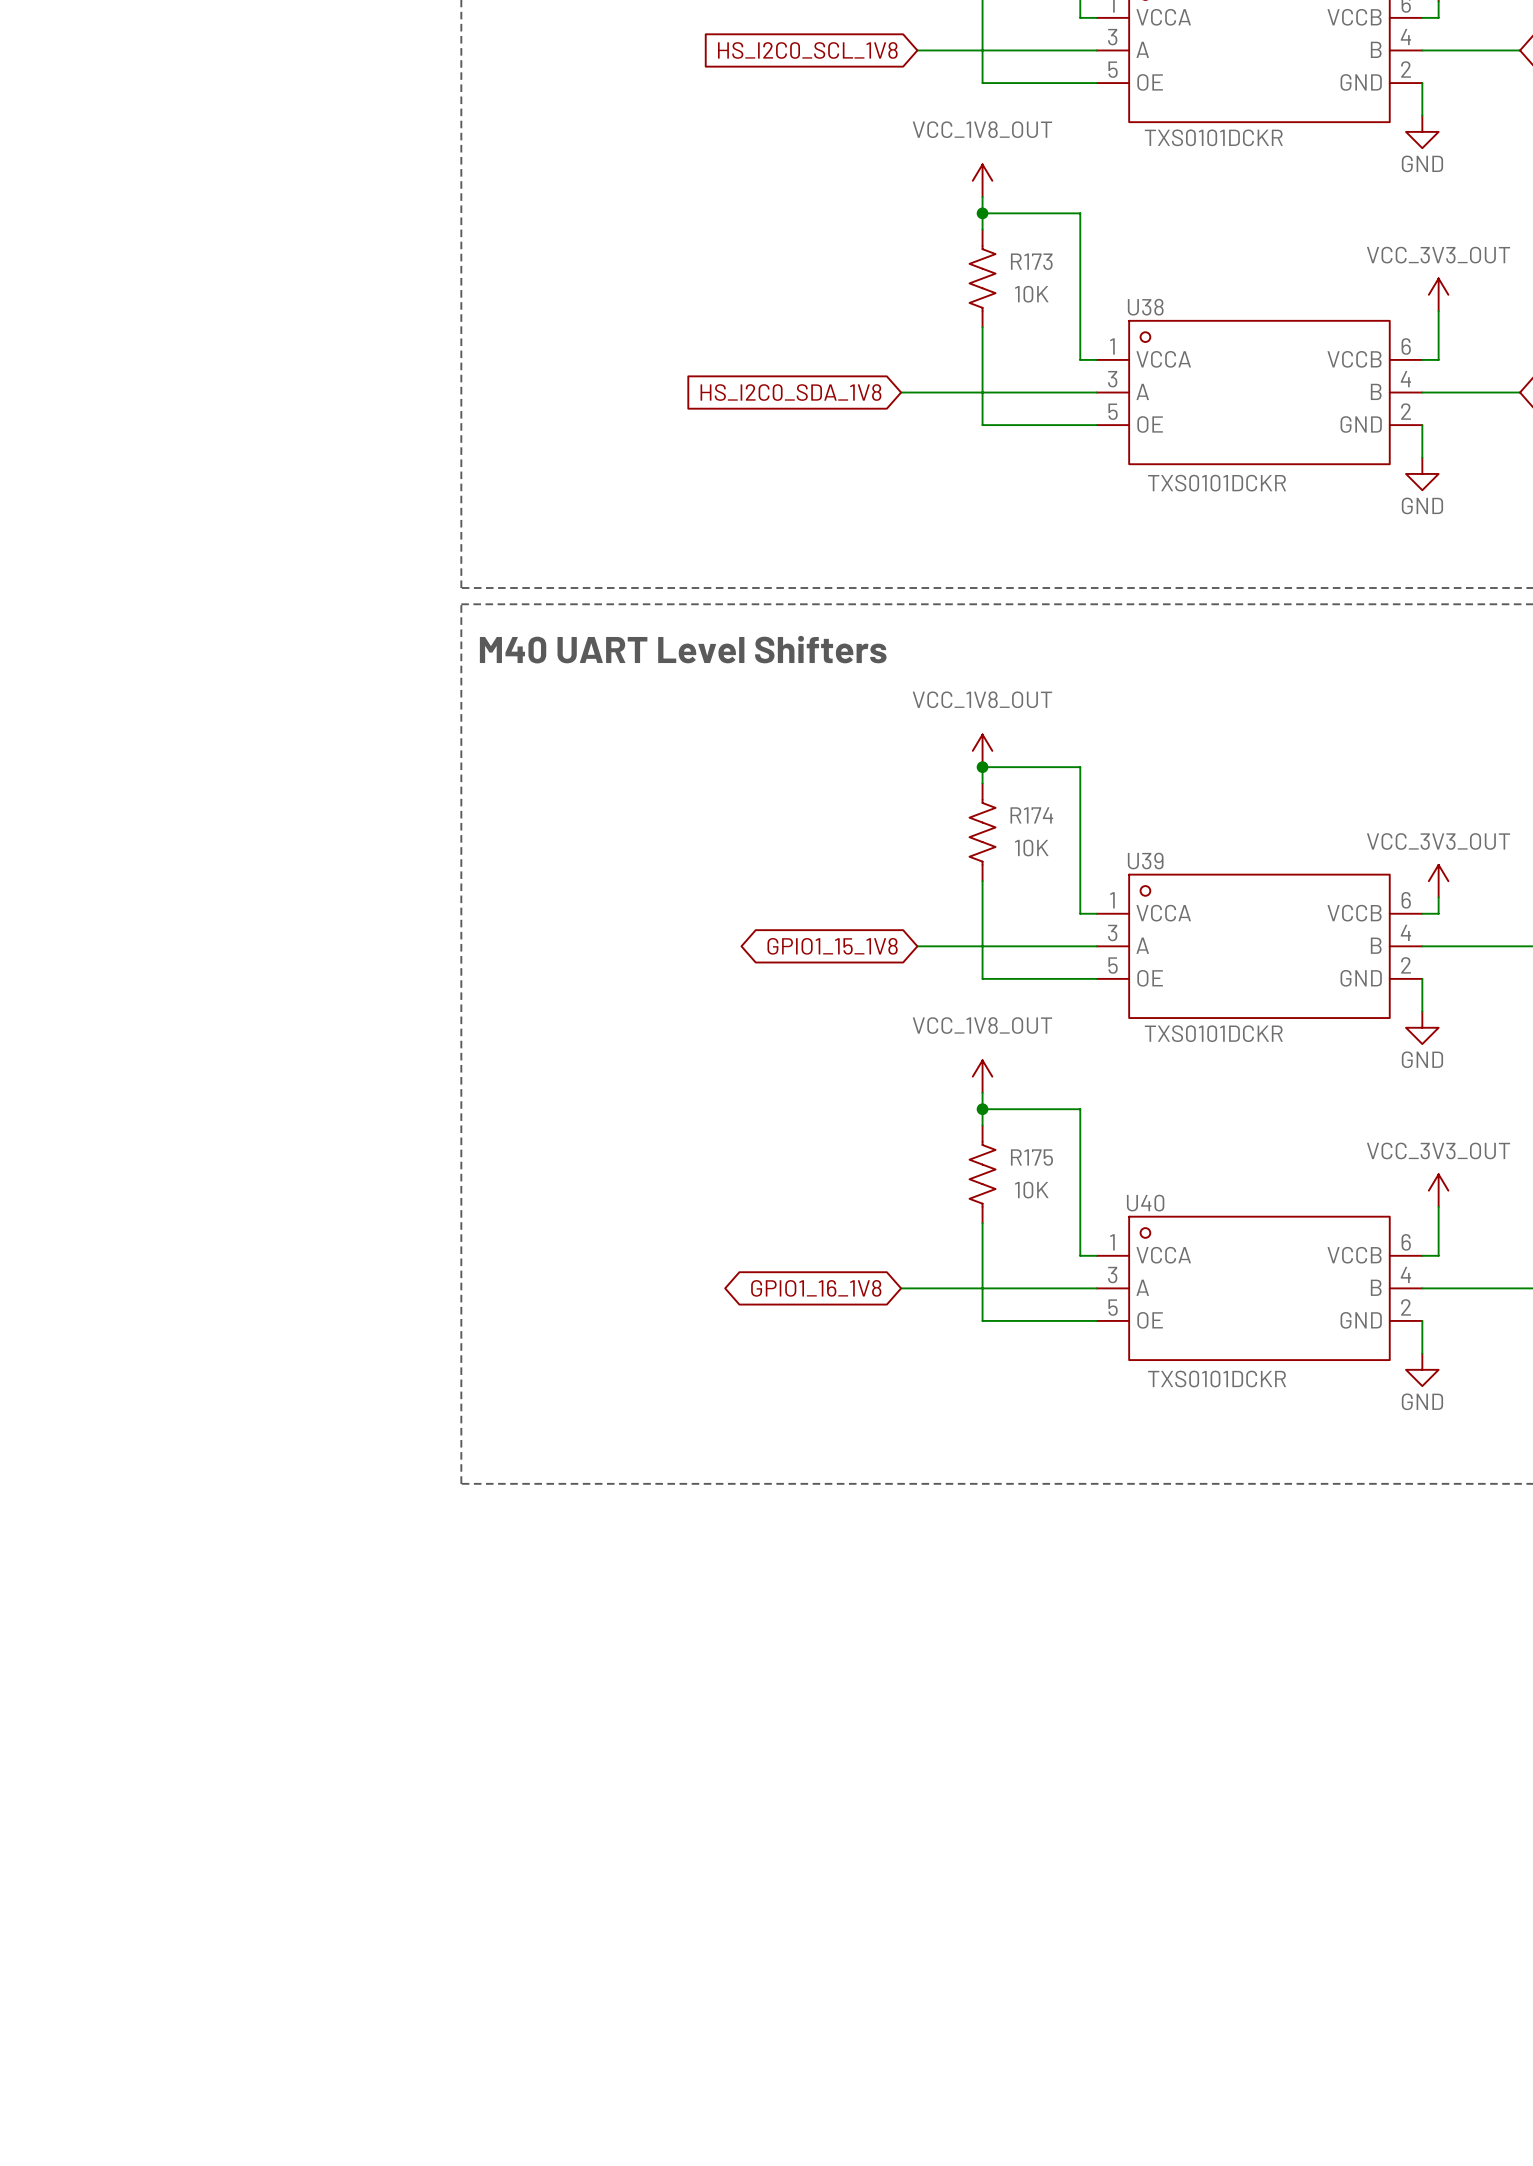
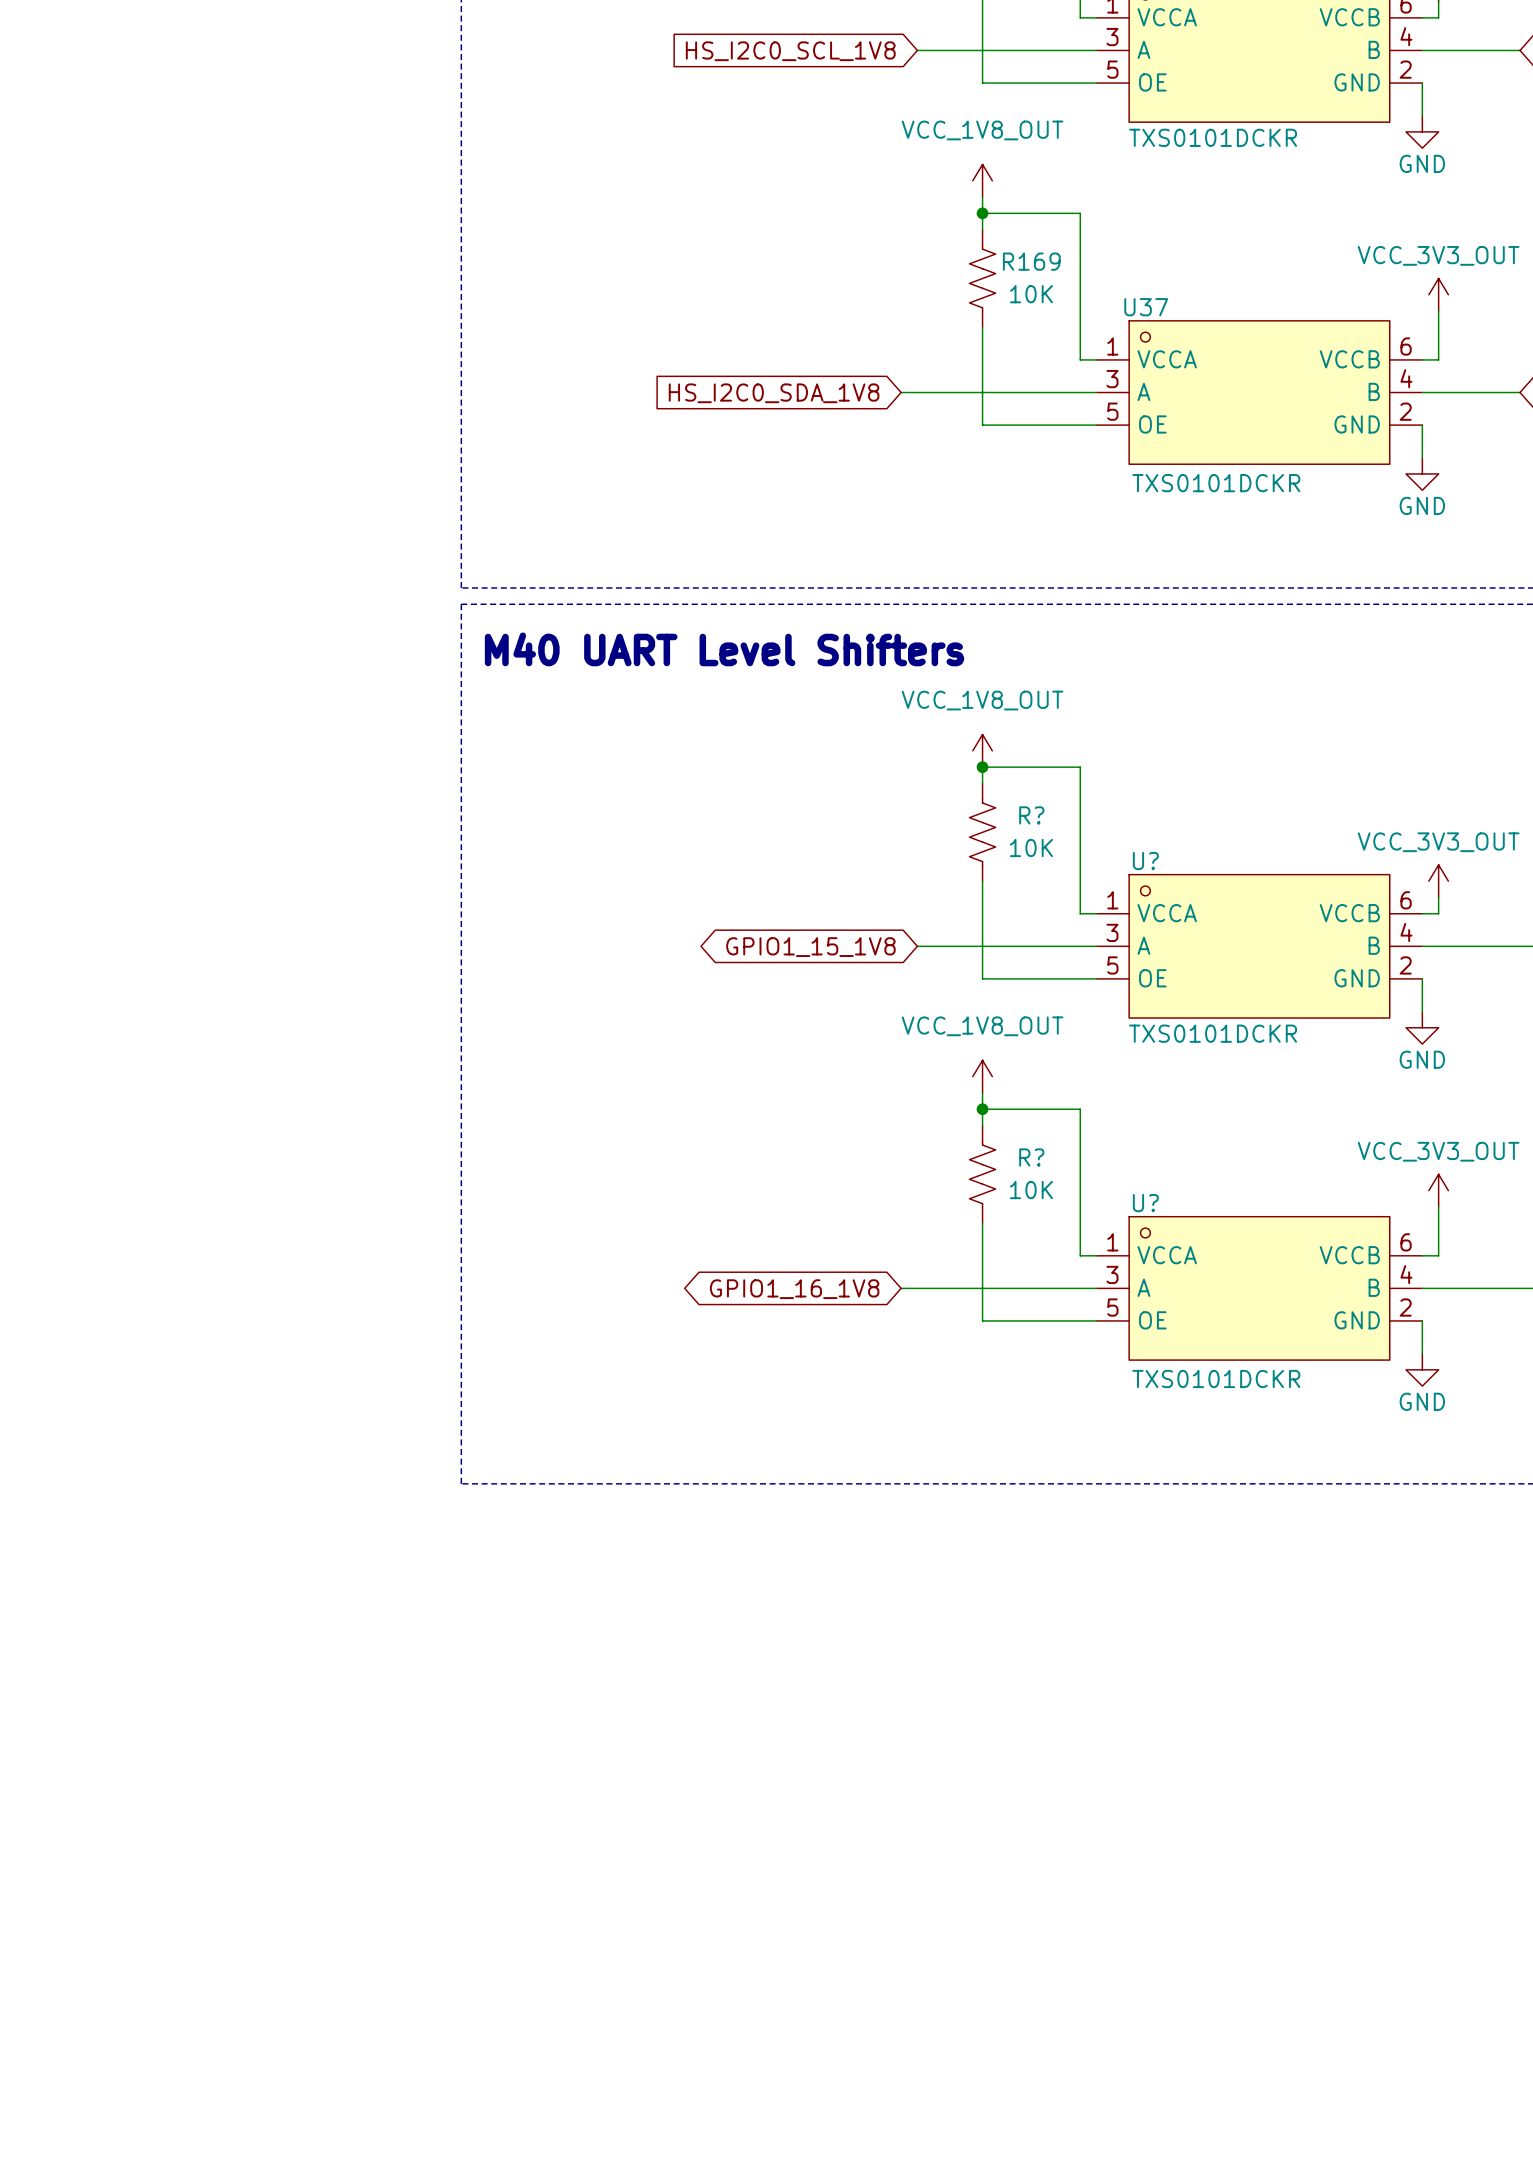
R173 name: R173 (1031, 261) -> R169 (1031, 261)
U38 name: U38 (1145, 307) -> U37 (1146, 307)
R174 name: R174 (1031, 815) -> R? (1031, 815)
U39 name: U39 (1145, 861) -> U? (1145, 861)
R175 name: R175 (1031, 1157) -> R? (1031, 1157)
U40 name: U40 (1145, 1203) -> U? (1145, 1203)

